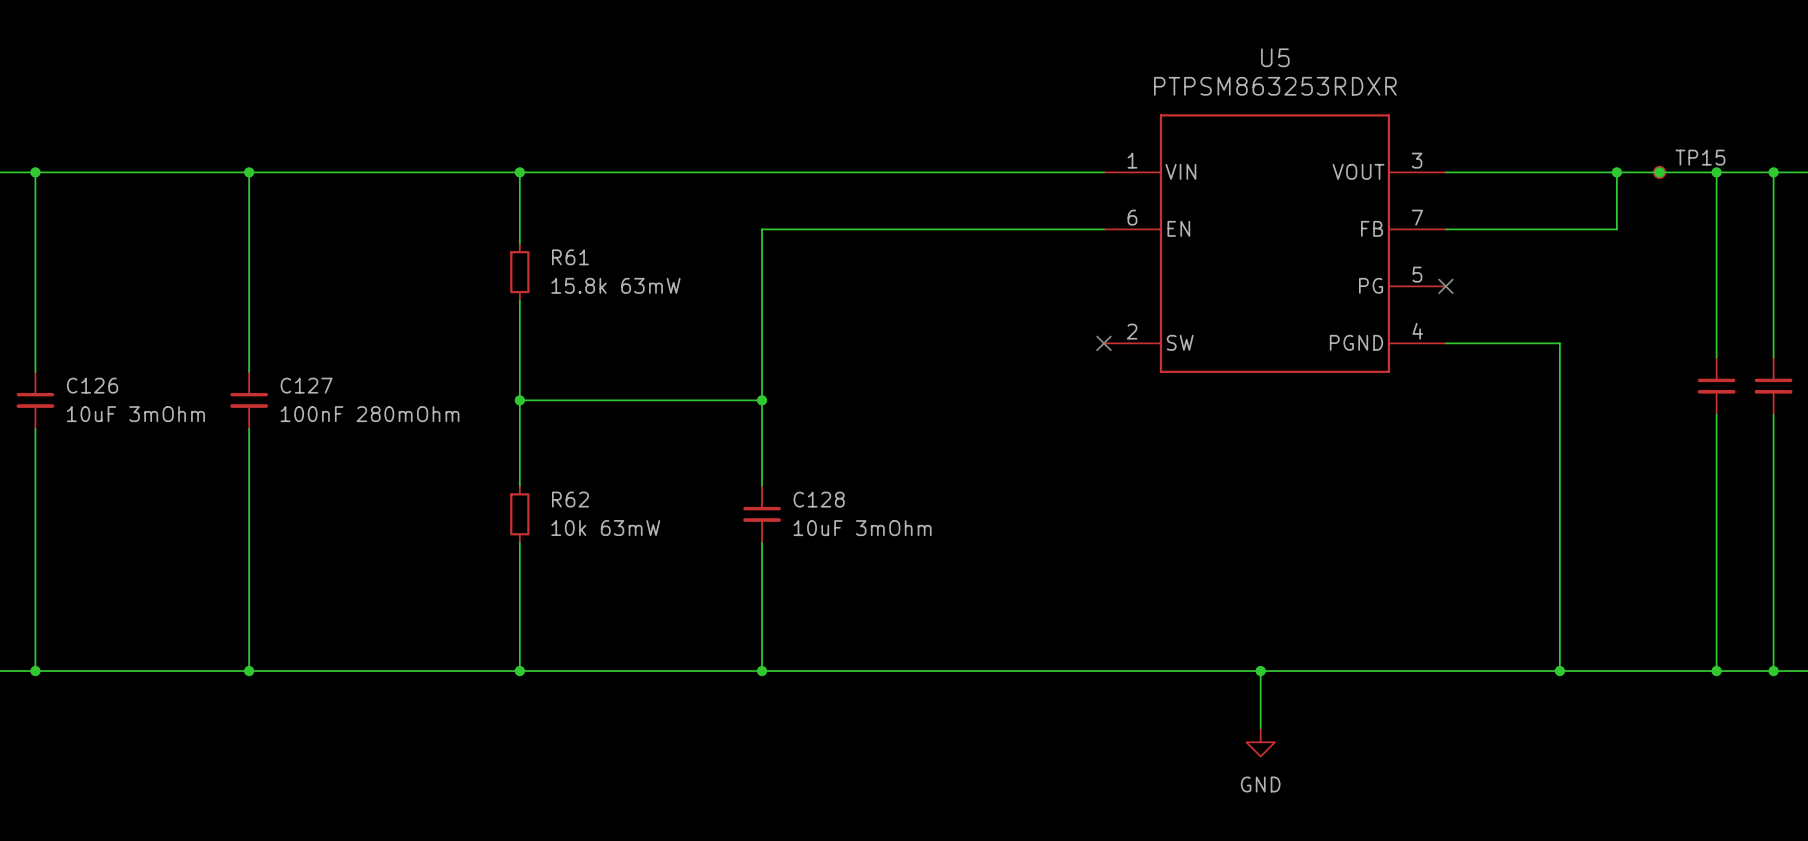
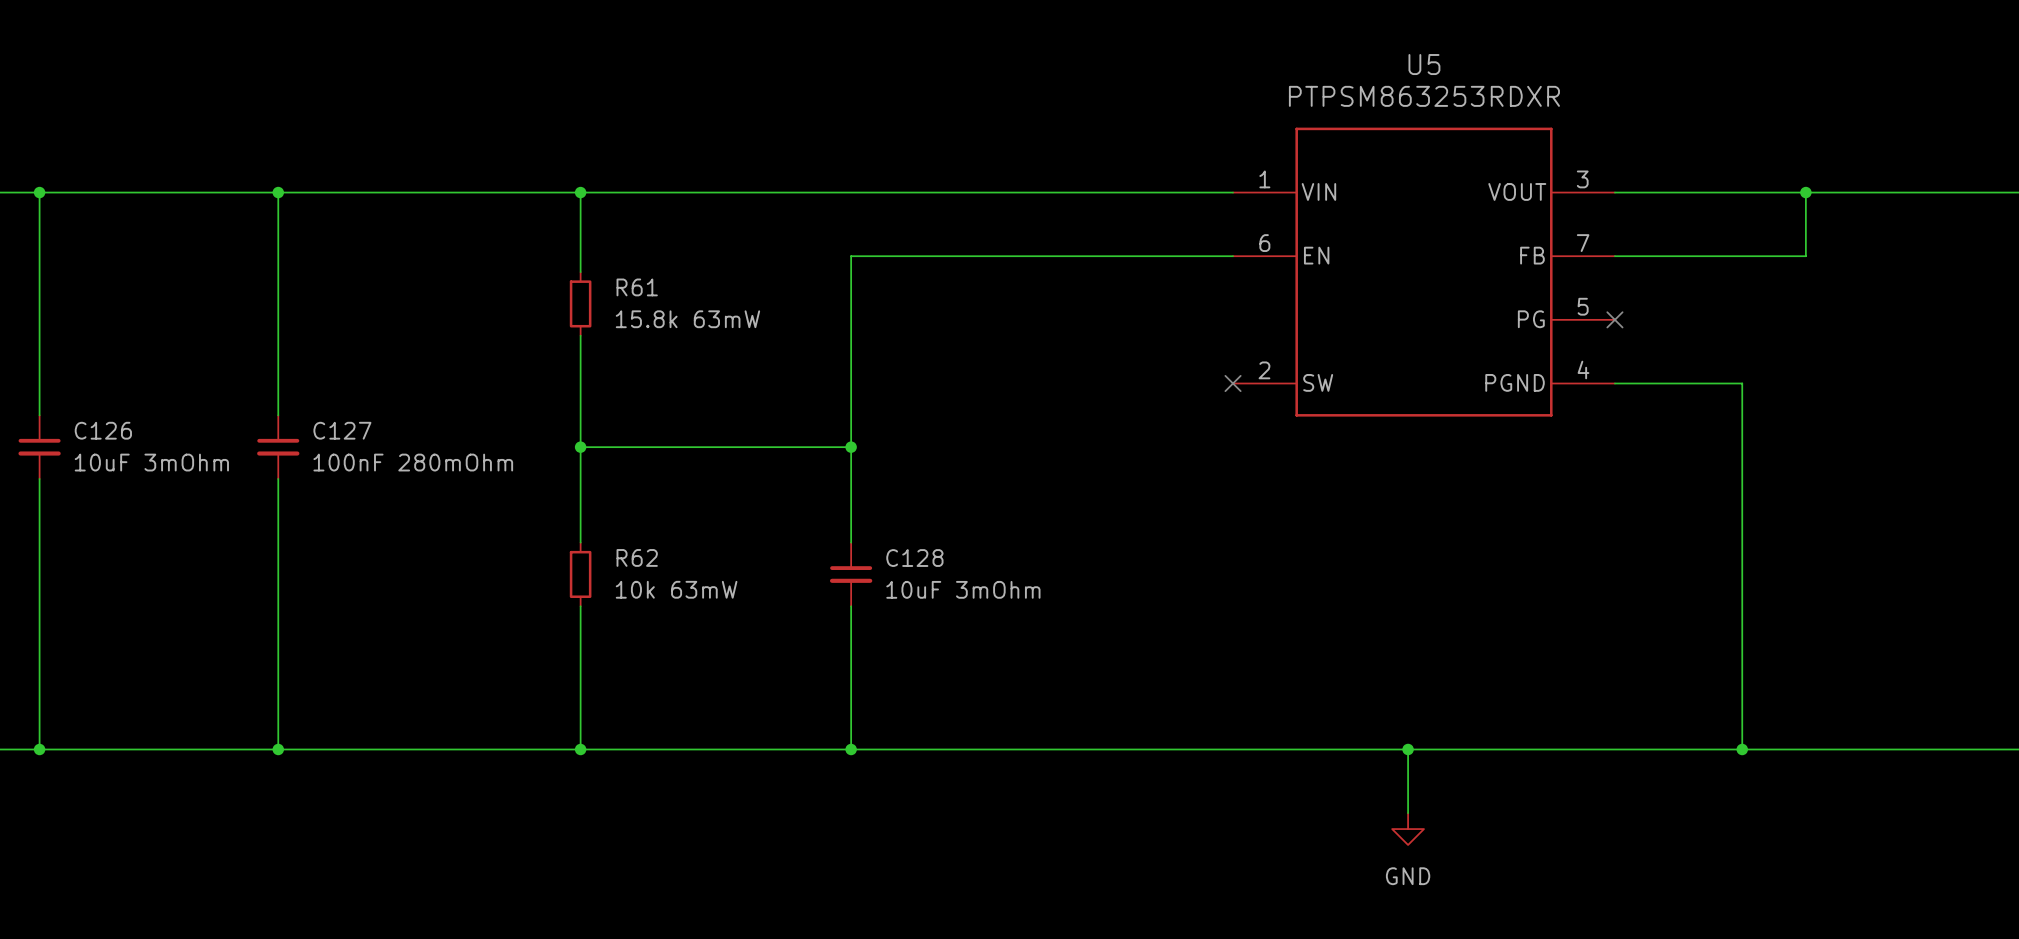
junction: (1659, 172) -> none
TP15: (1659, 172) -> none
wire: (1716, 172) (1716, 357) -> none
junction: (1716, 172) -> none
wire: (1773, 172) (1773, 357) -> none
junction: (1773, 172) -> none
part: (1716, 386) -> none
part: (1773, 386) -> none
wire: (1716, 414) (1716, 671) -> none
wire: (1773, 414) (1773, 671) -> none
junction: (1716, 671) -> none
junction: (1773, 671) -> none

